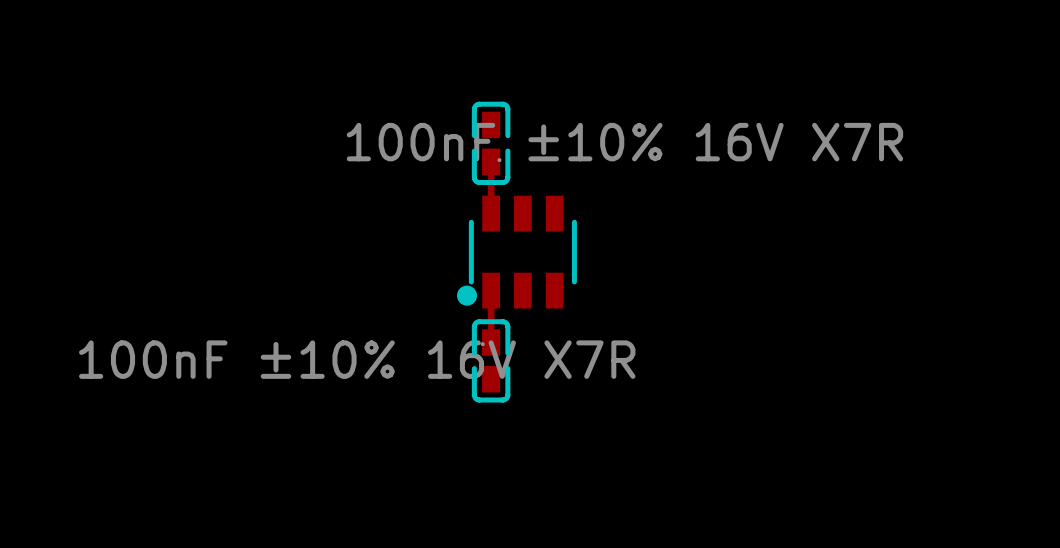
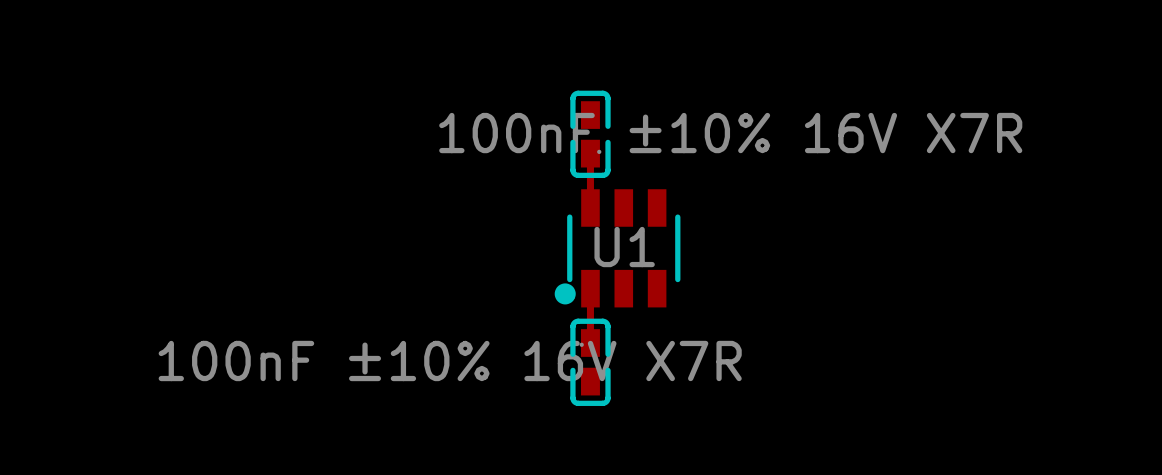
U1 name: none -> U1 (624, 247)

